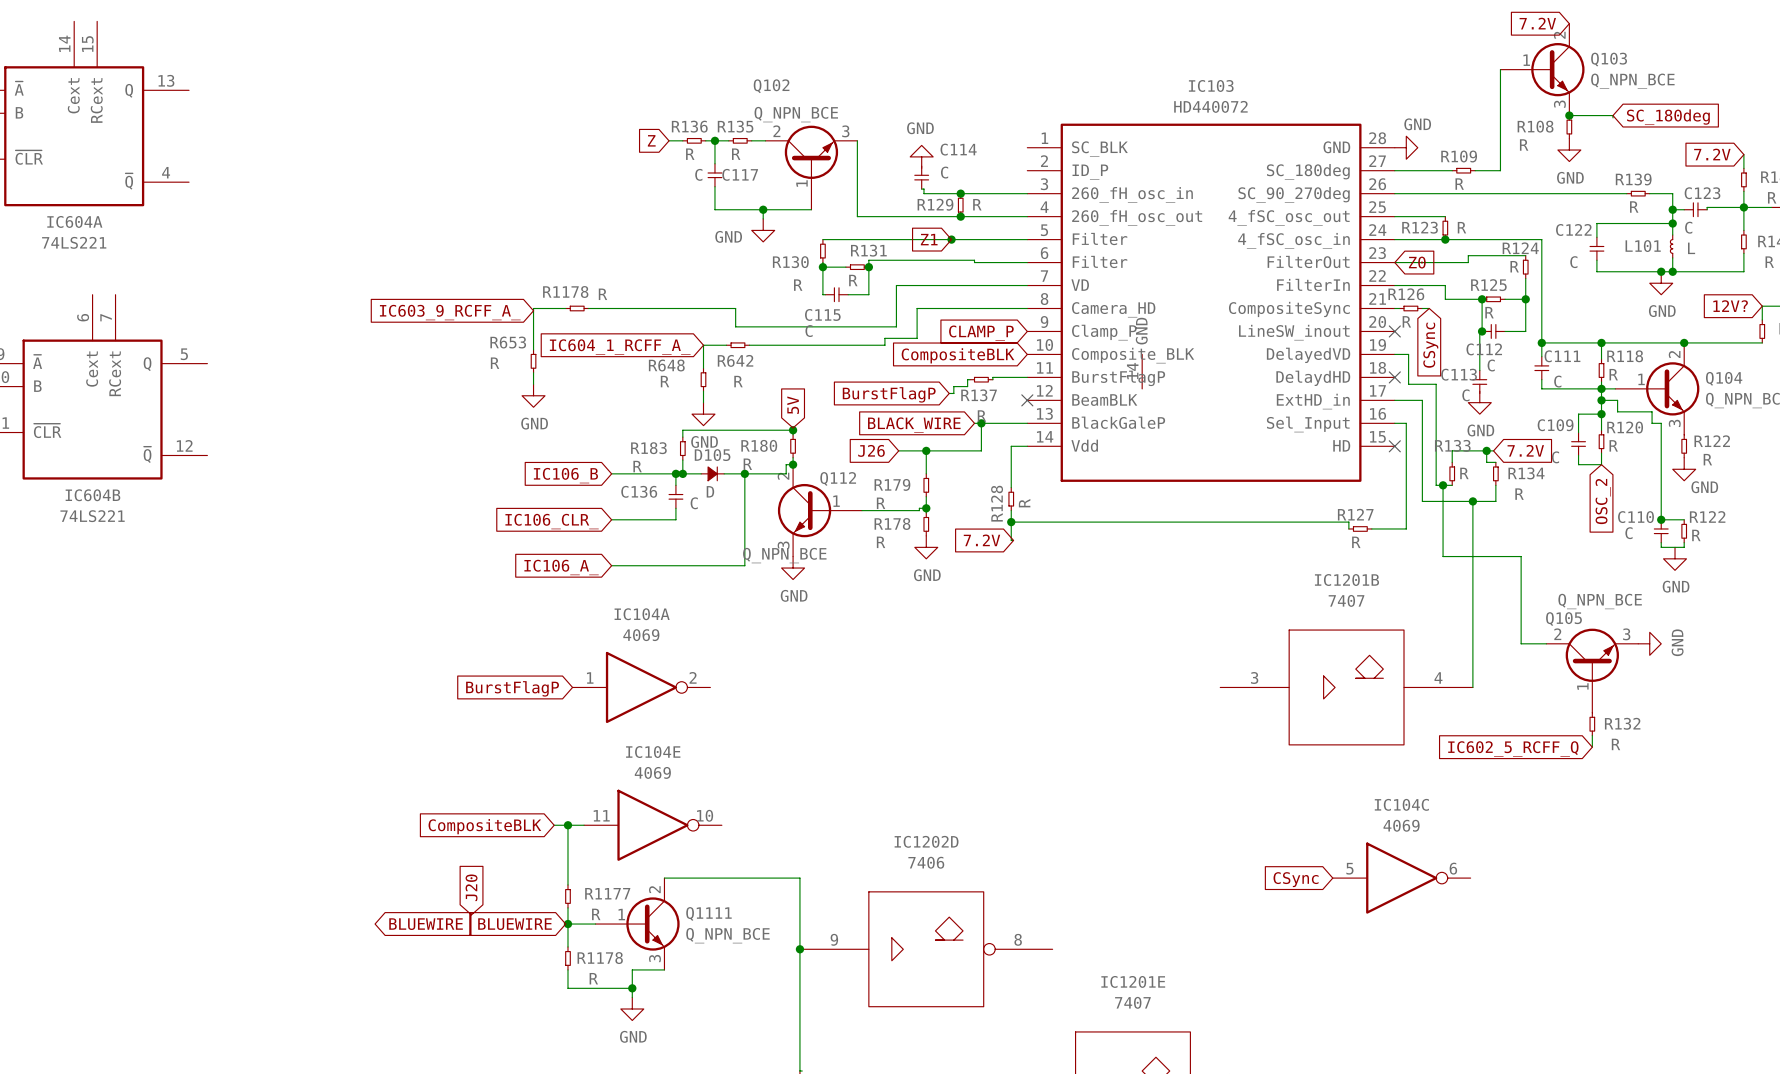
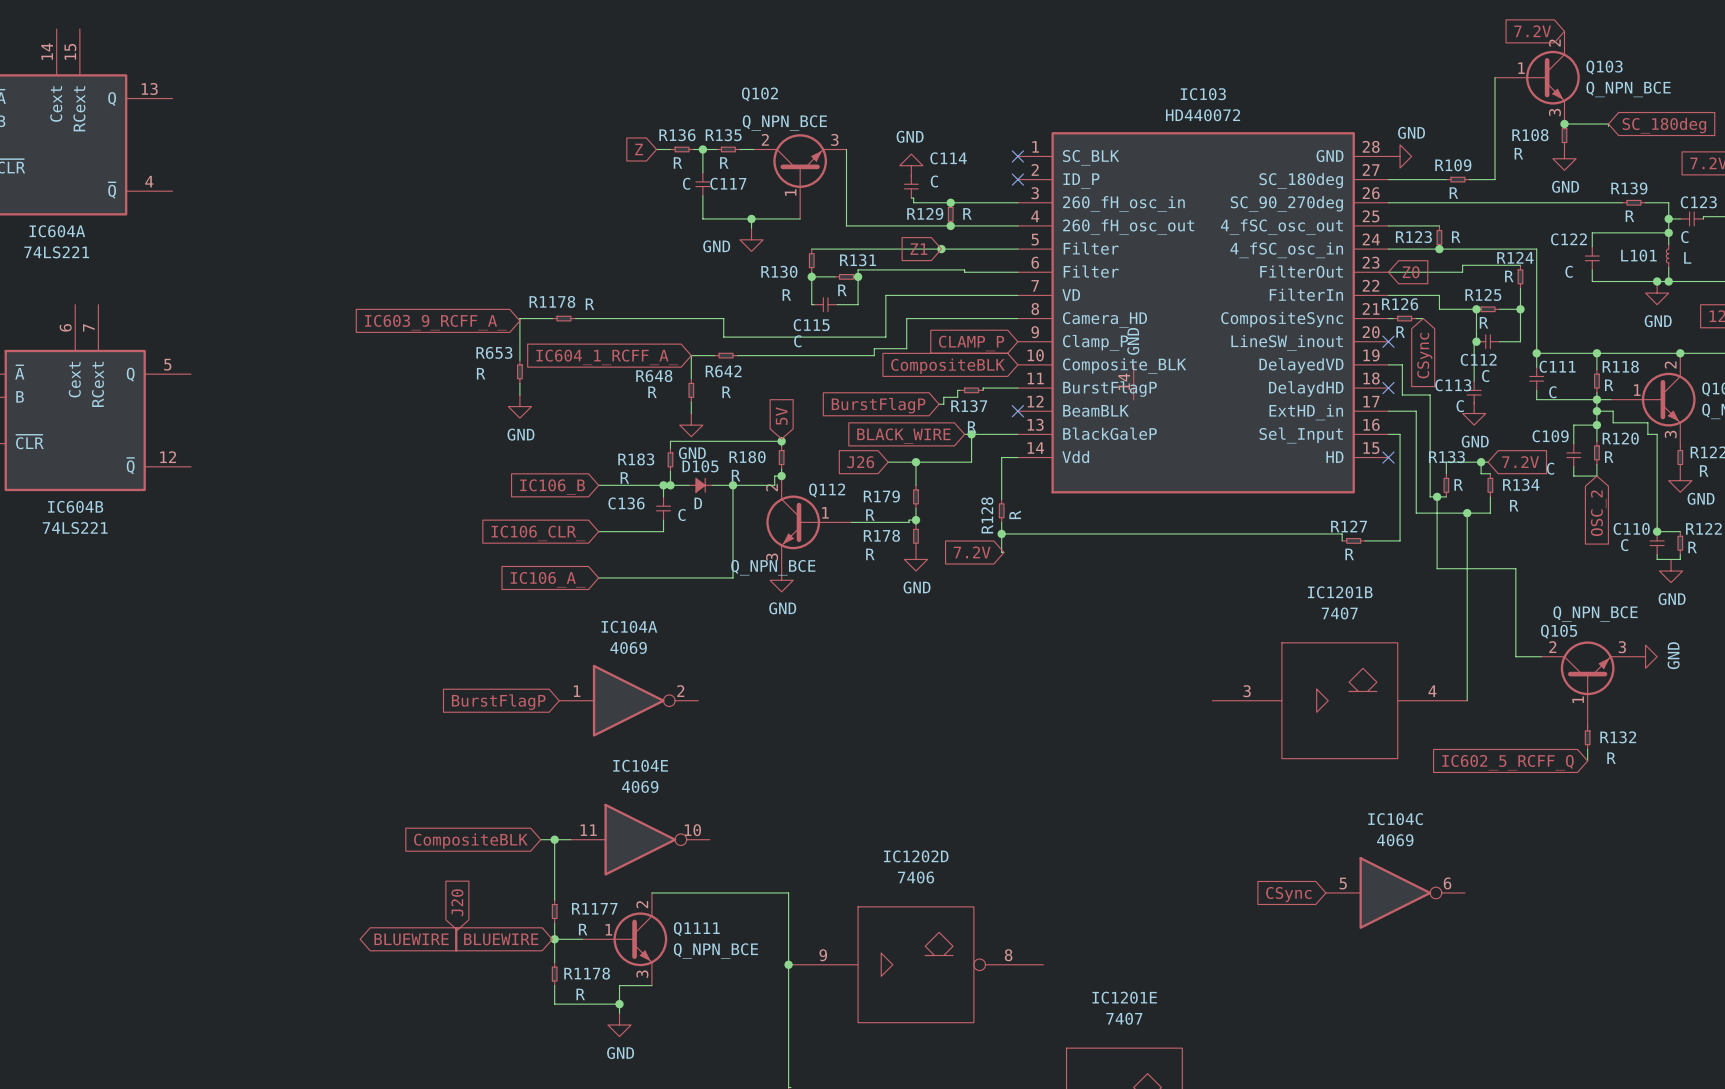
no-connect mark: none -> (1017, 156)
no-connect mark: none -> (1017, 179)

